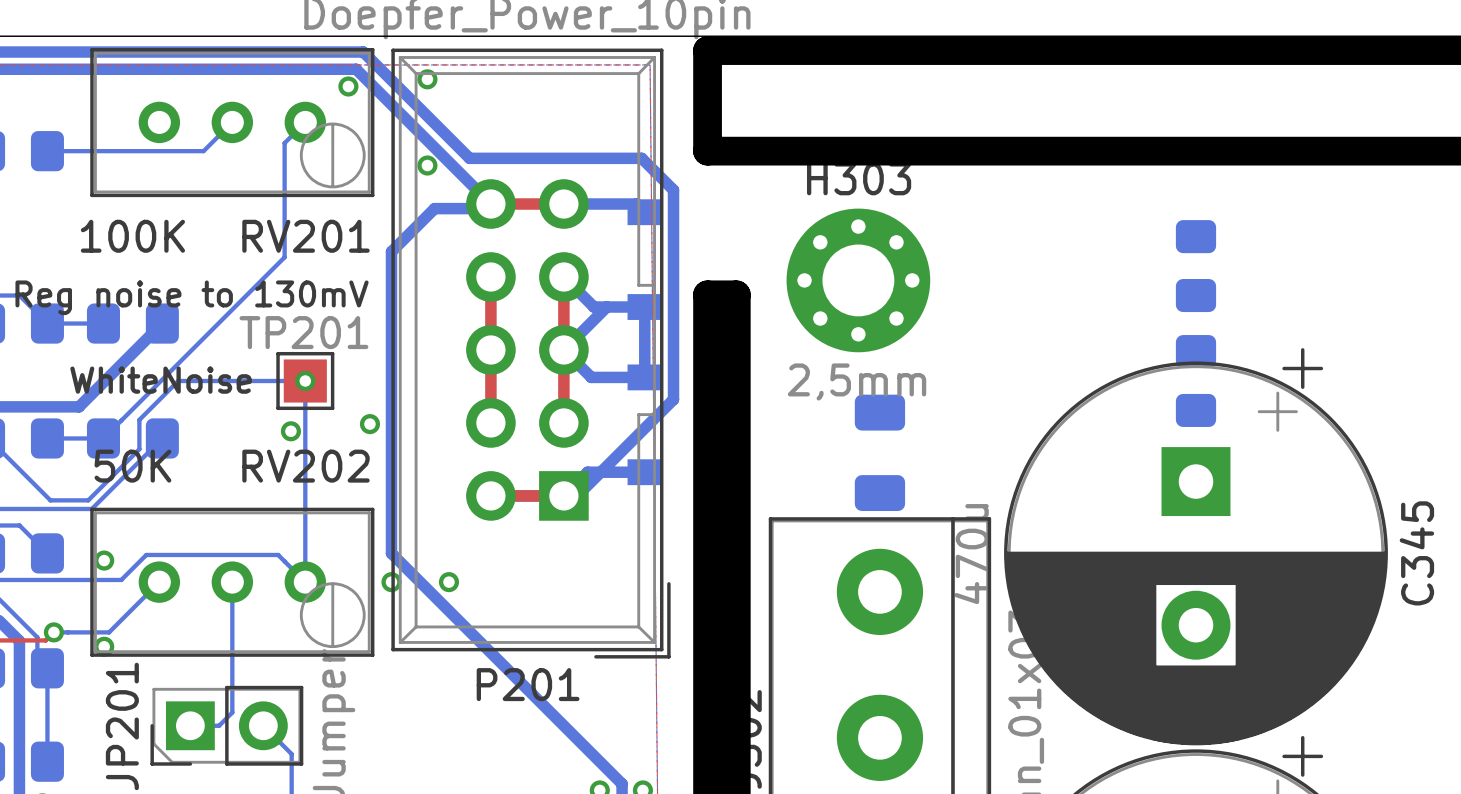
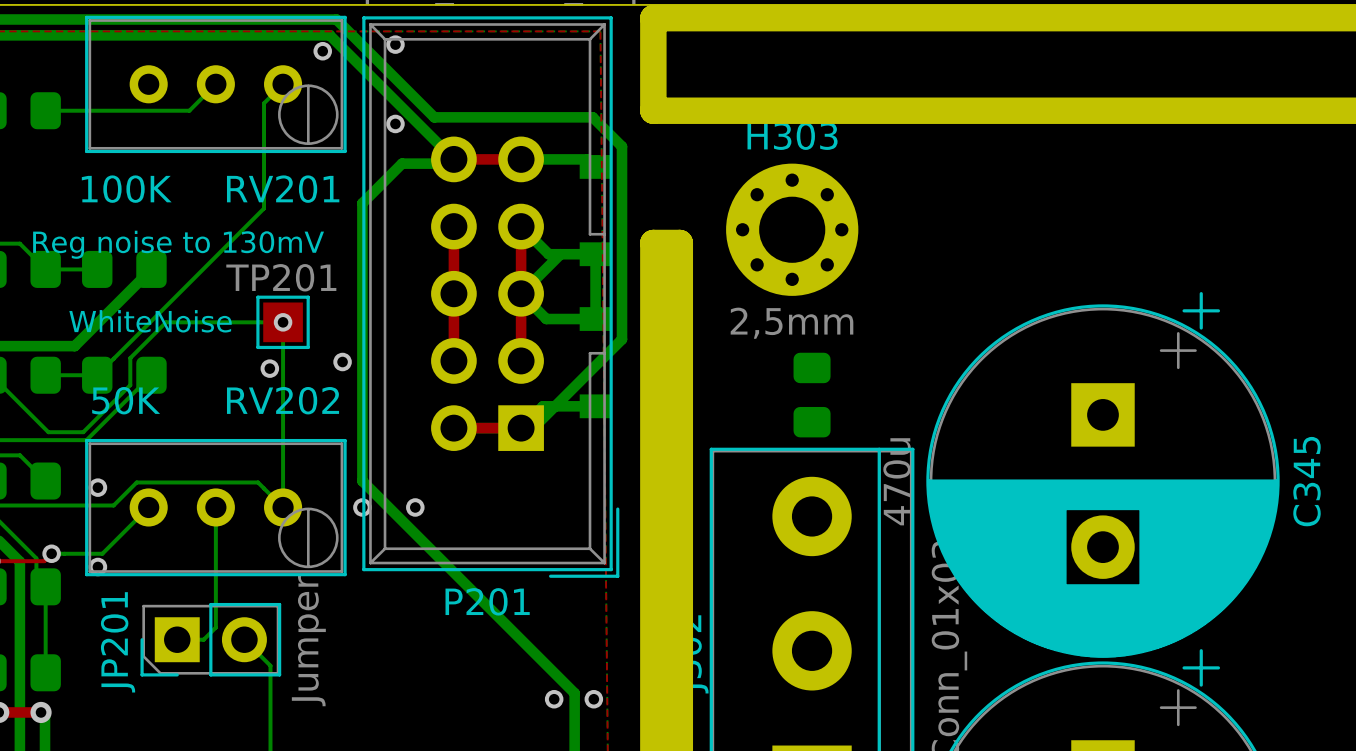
part: (1195, 266) -> none
part: (1195, 381) -> none
part footprint: [854, 394, 906, 512] -> [793, 352, 831, 438]

